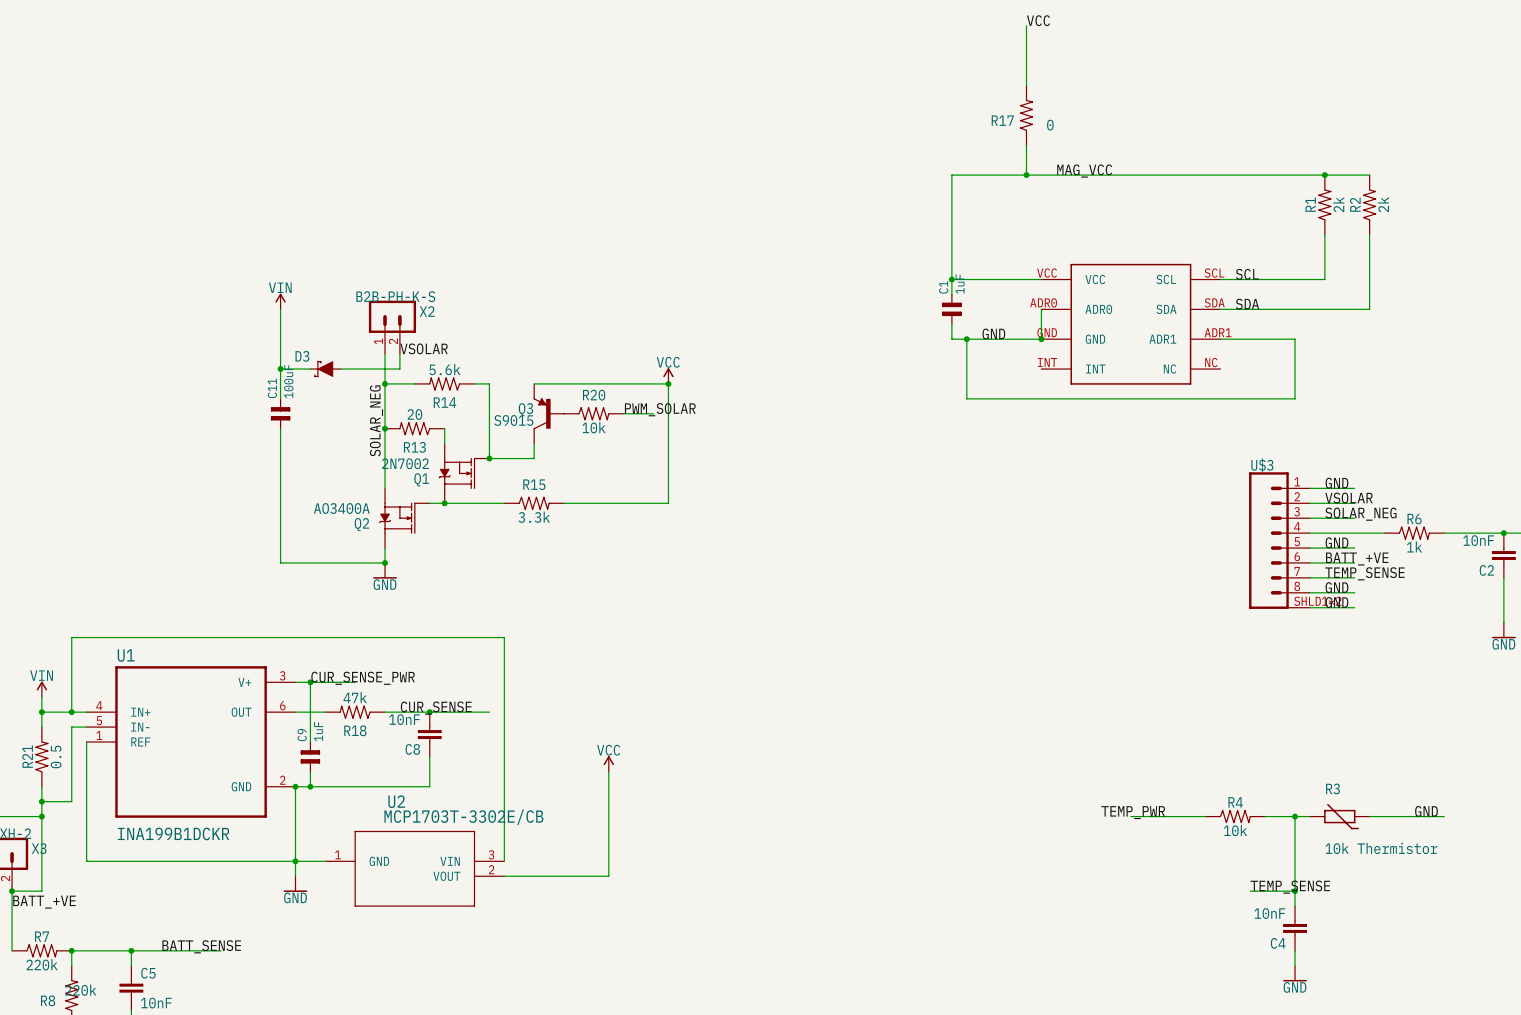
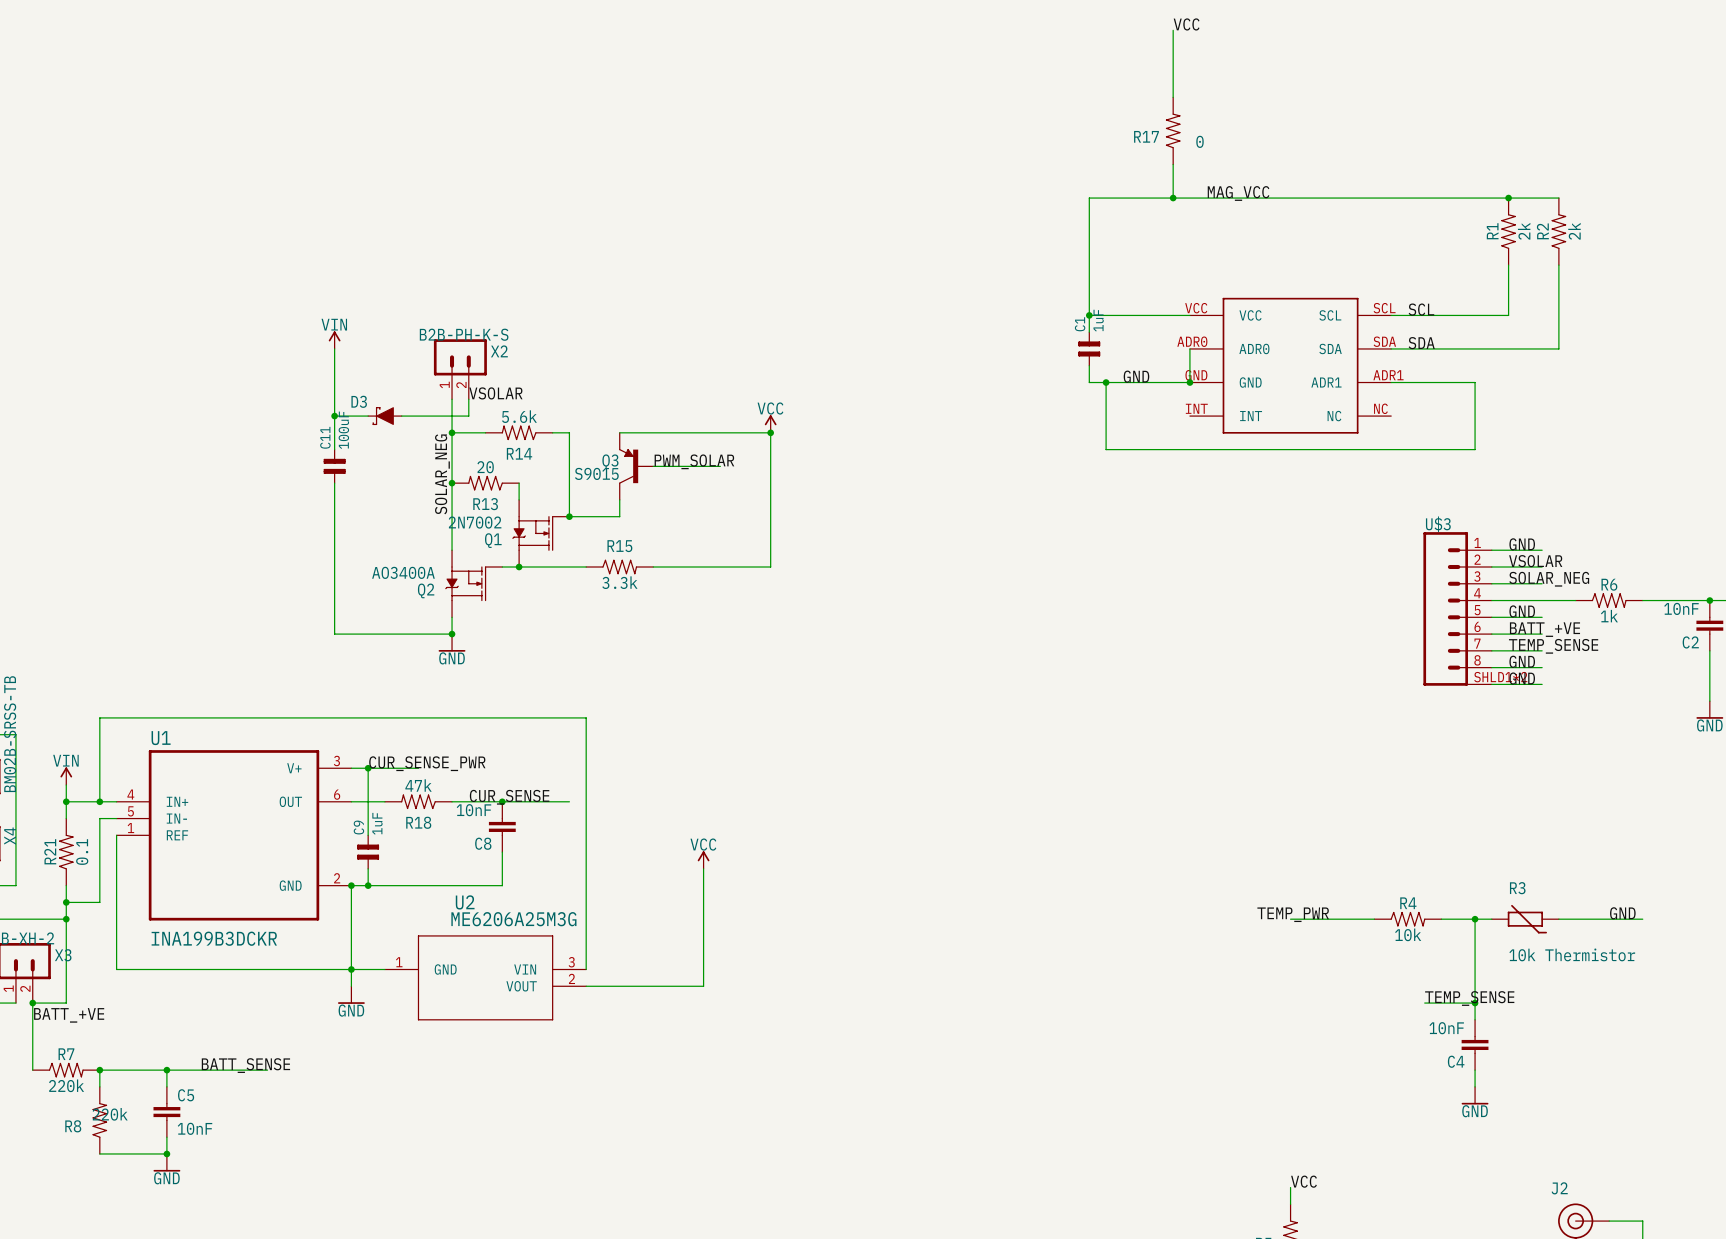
label position: PWM_SOLAR (660, 409) -> PWM_SOLAR (694, 461)
R20: 10k (593, 413) -> none
R21 value: 0.5 (56, 756) -> 0.1 (82, 852)
U2 value: MCP1703T-3302E/CB (463, 817) -> ME6206A25M3G (513, 919)
U1 value: INA199B1DCKR (173, 833) -> INA199B3DCKR (214, 938)

